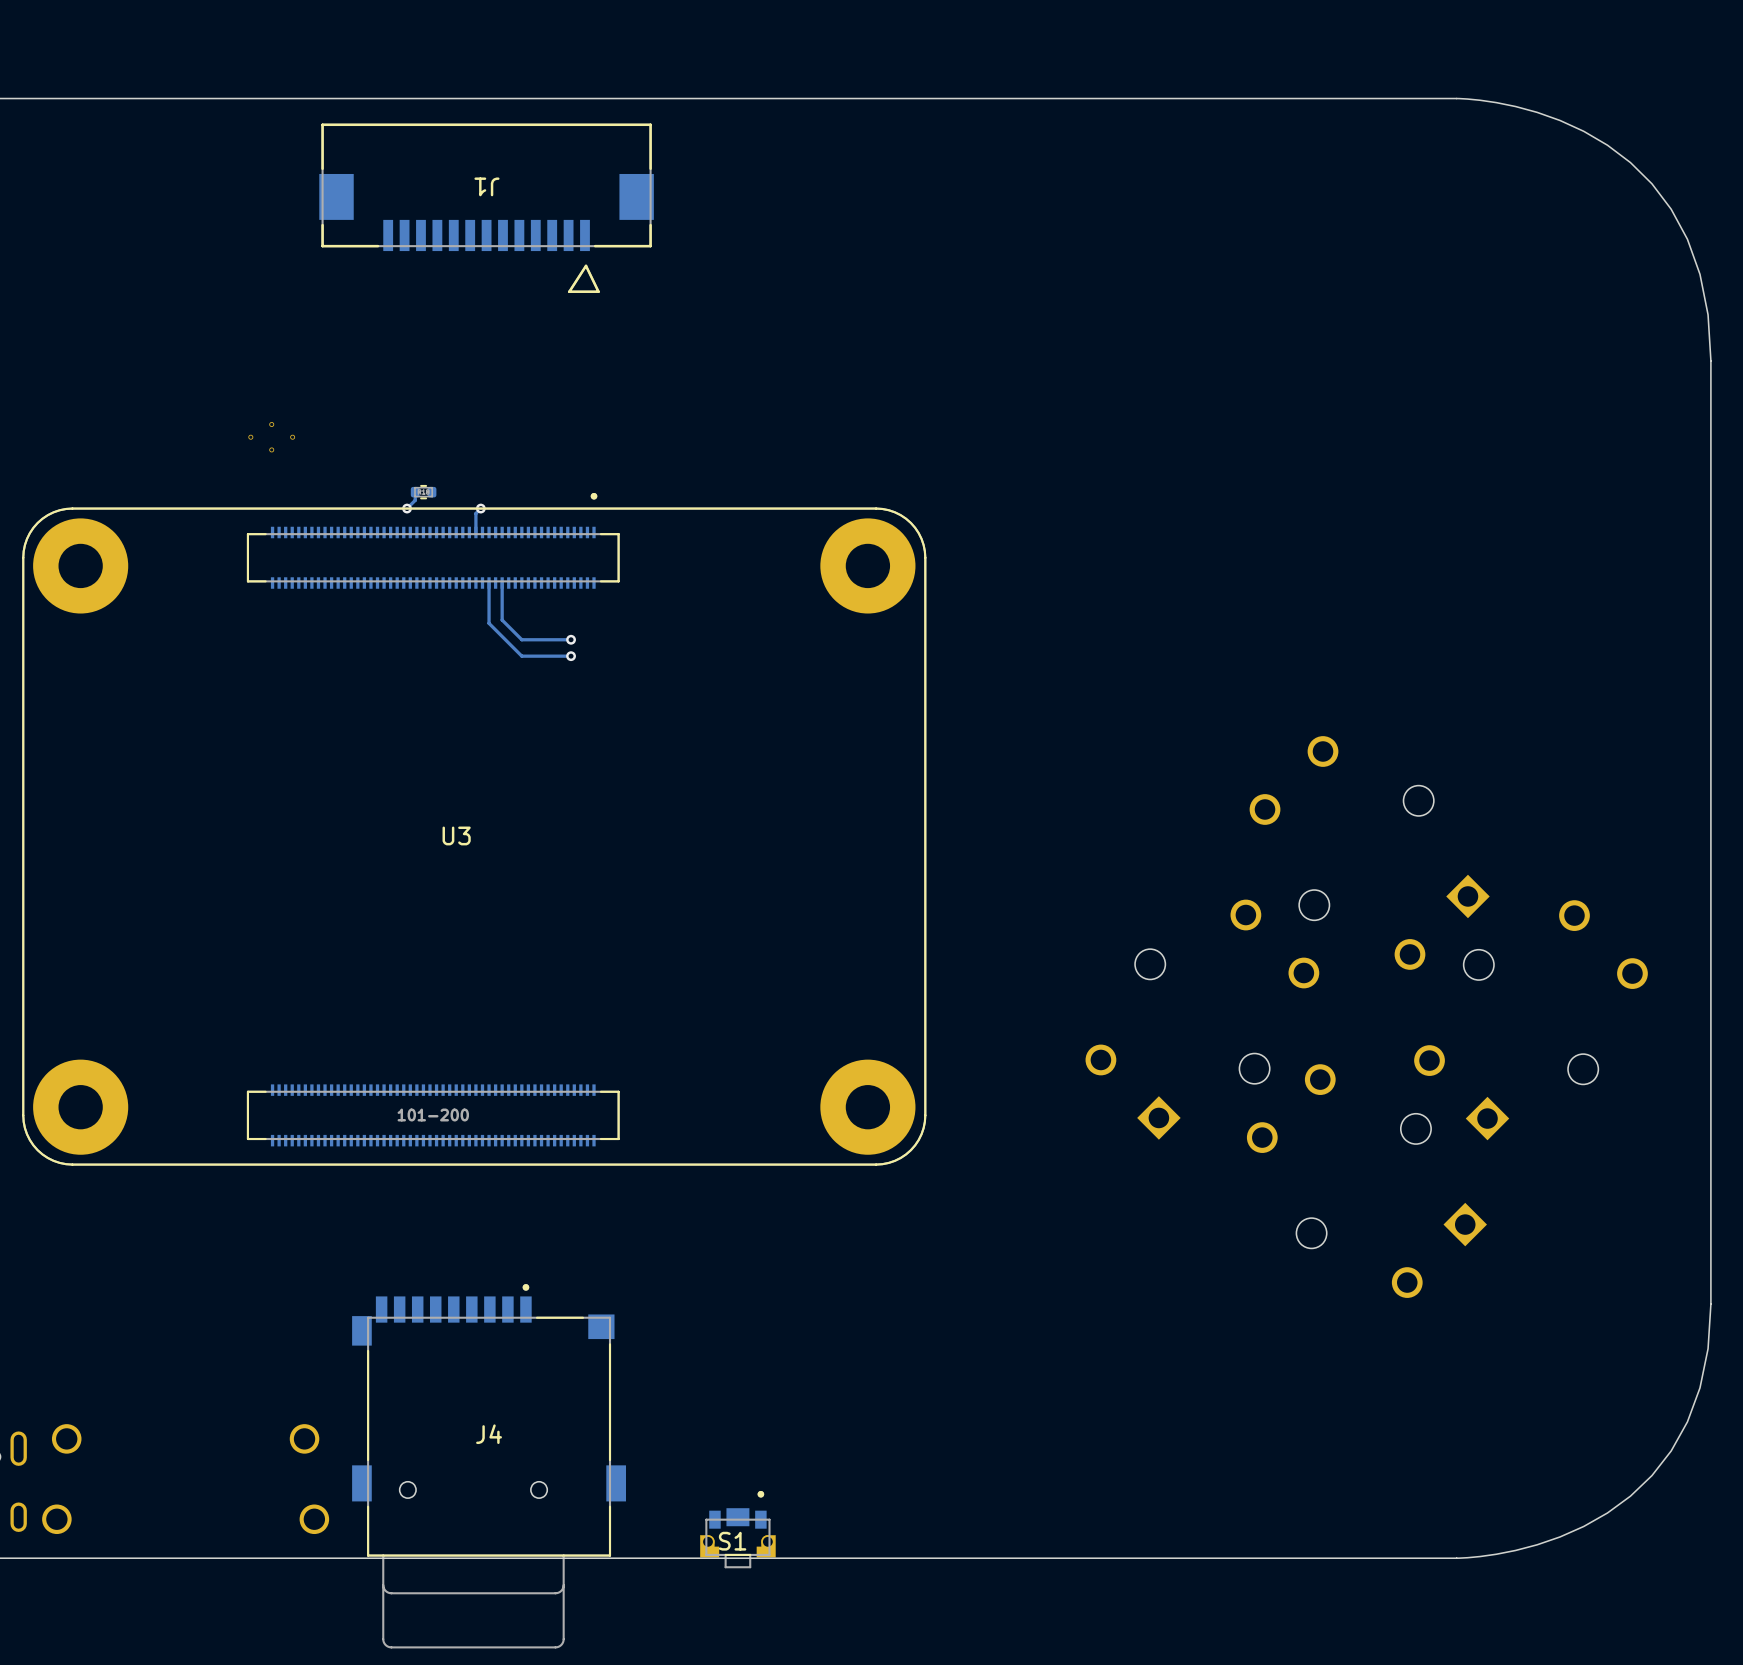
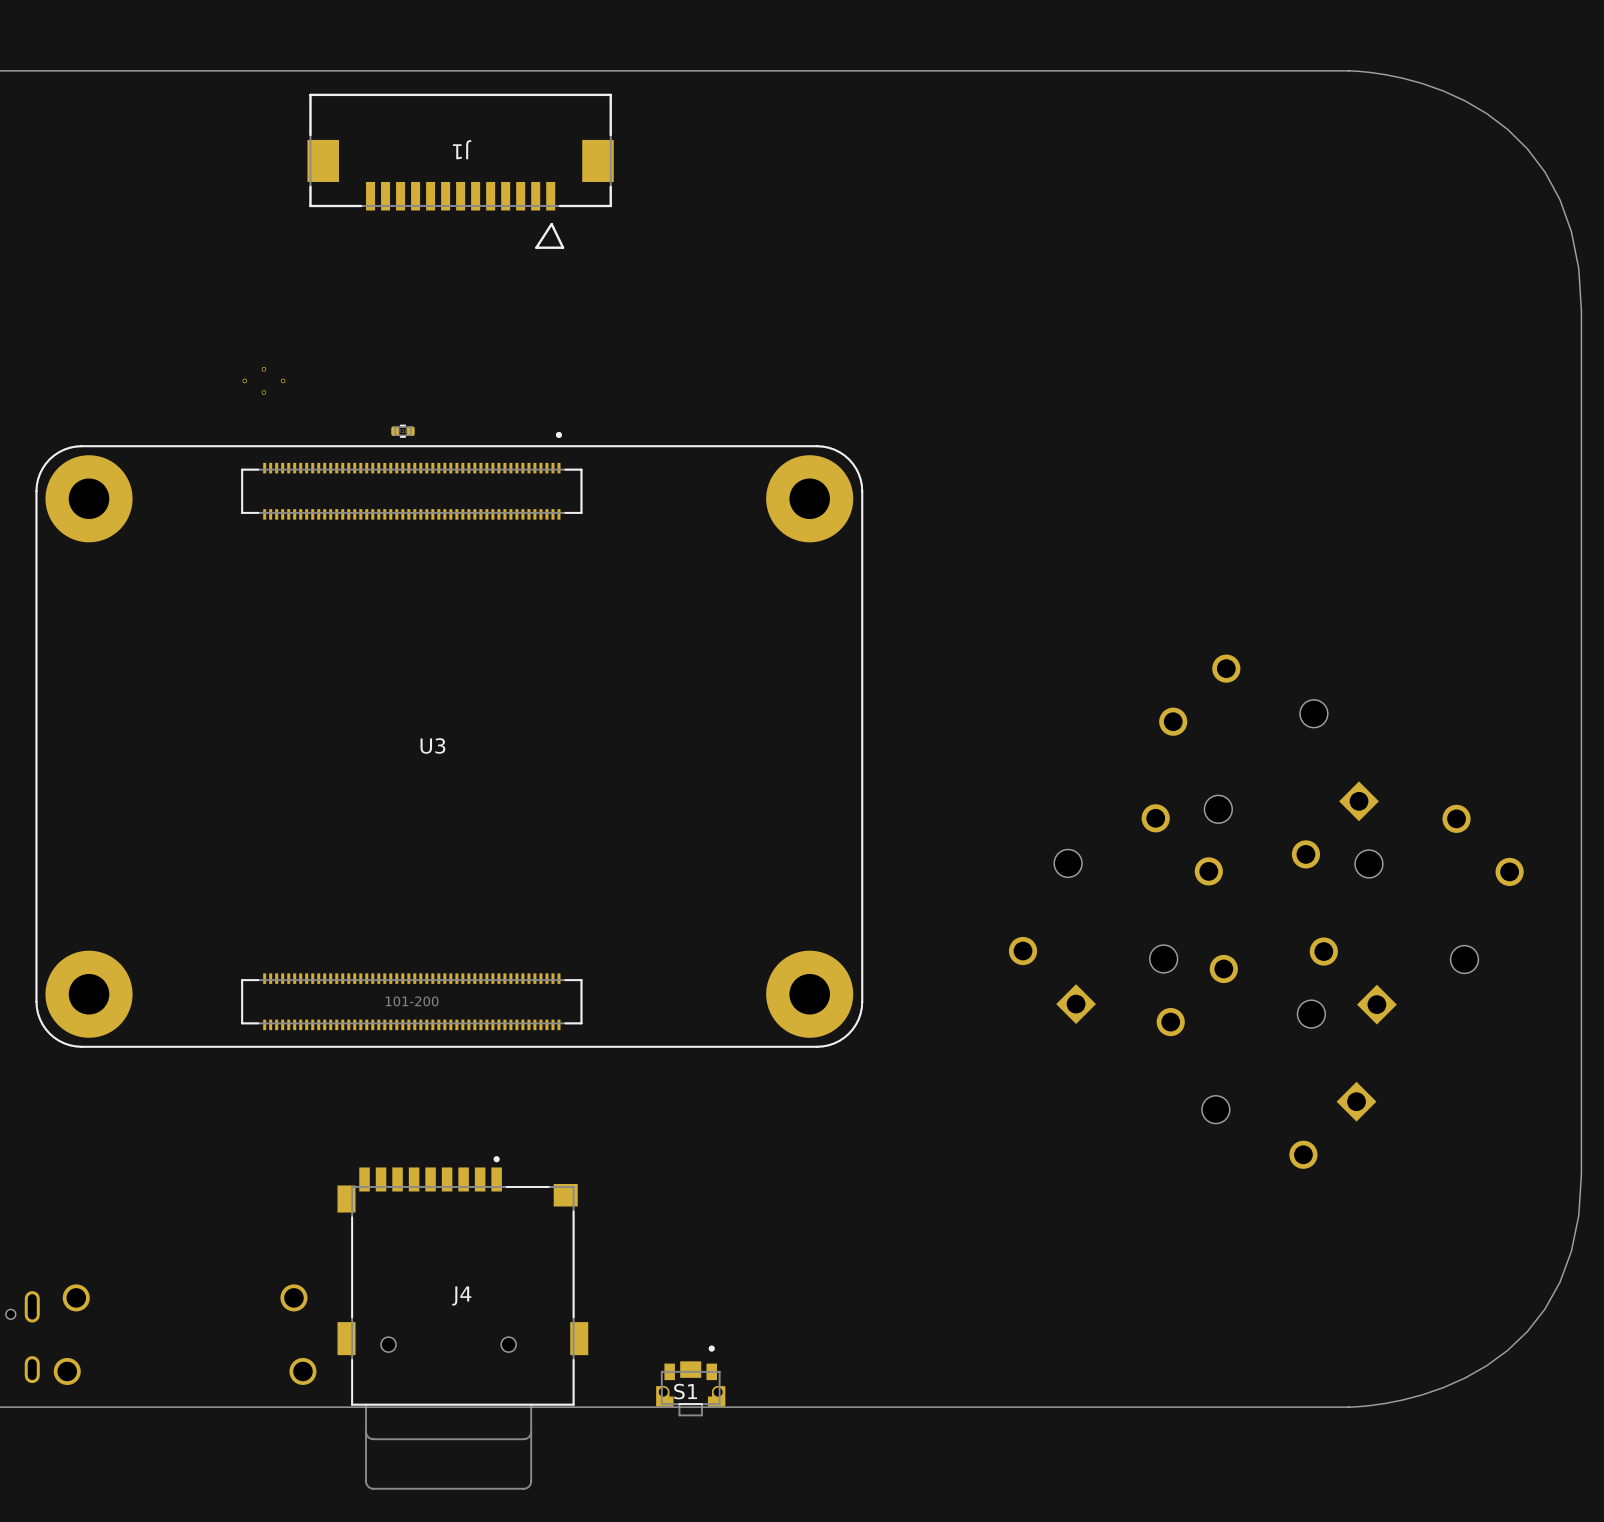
track: (415, 492) (415, 500) (407, 508) -> none
via: (407, 508) -> none
track: (480, 508) (475, 513) (475, 532) -> none
via: (480, 508) -> none
track: (489, 583) (489, 623) (521, 656) (571, 656) -> none
track: (502, 583) (502, 620) (521, 639) (571, 639) -> none
via: (571, 639) -> none
via: (571, 656) -> none

